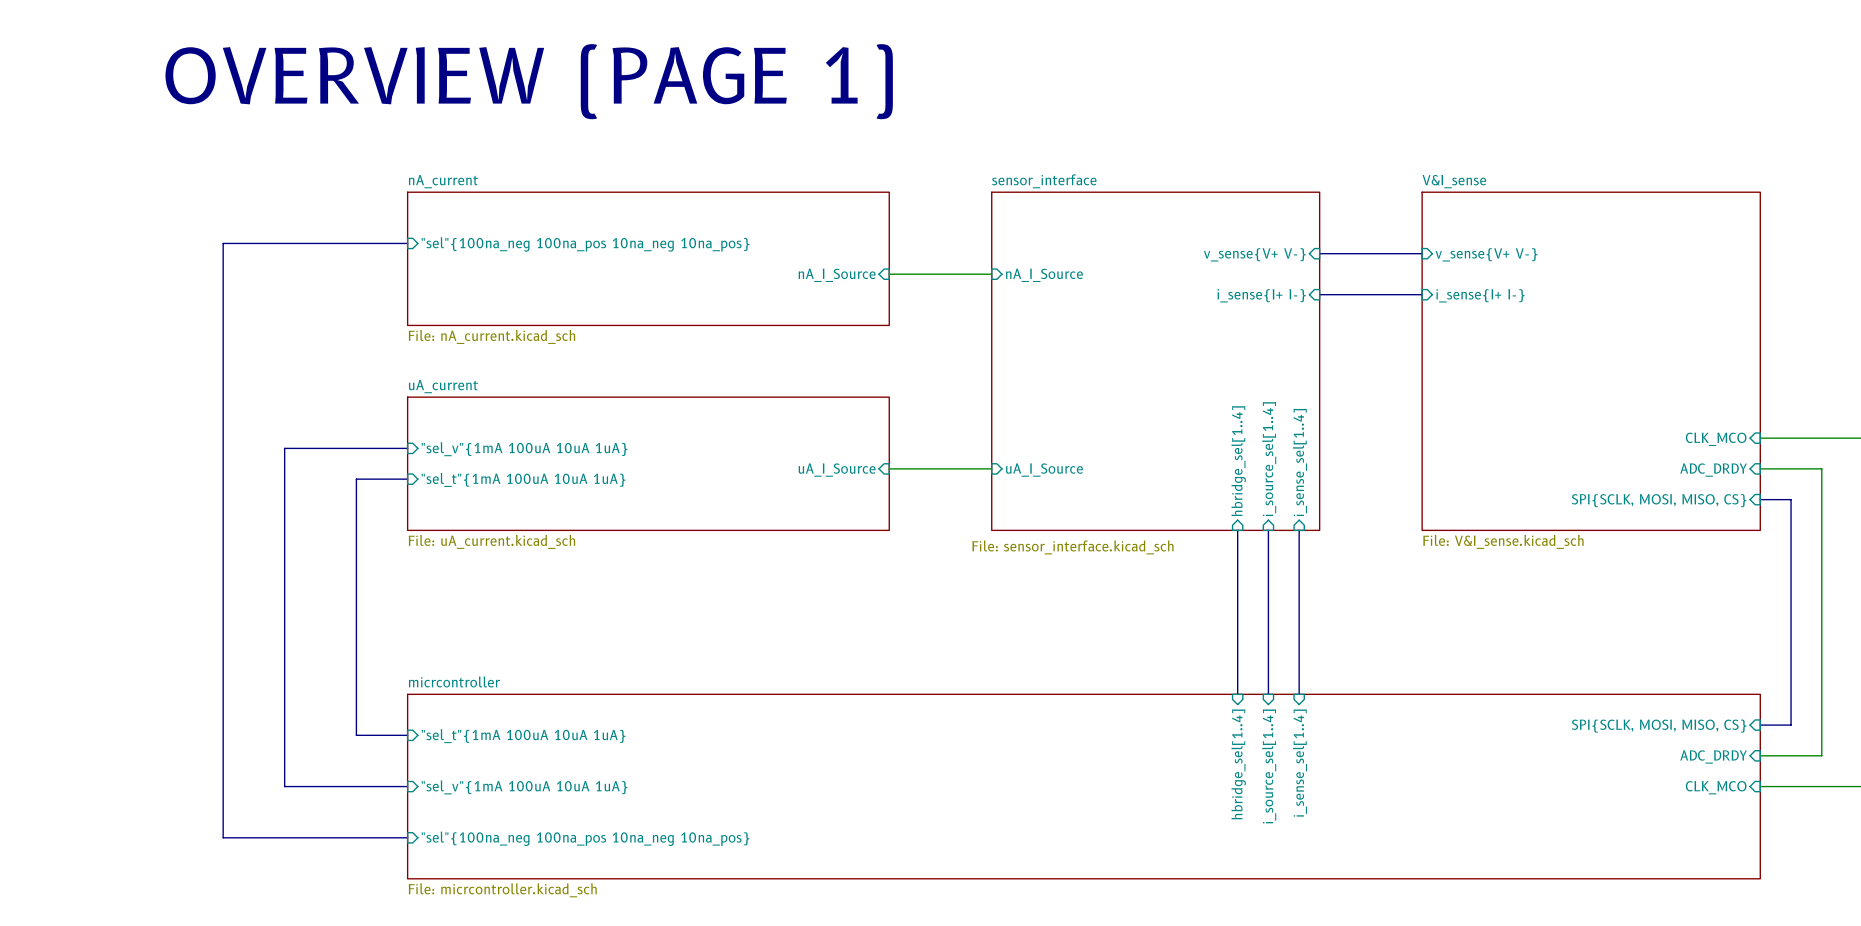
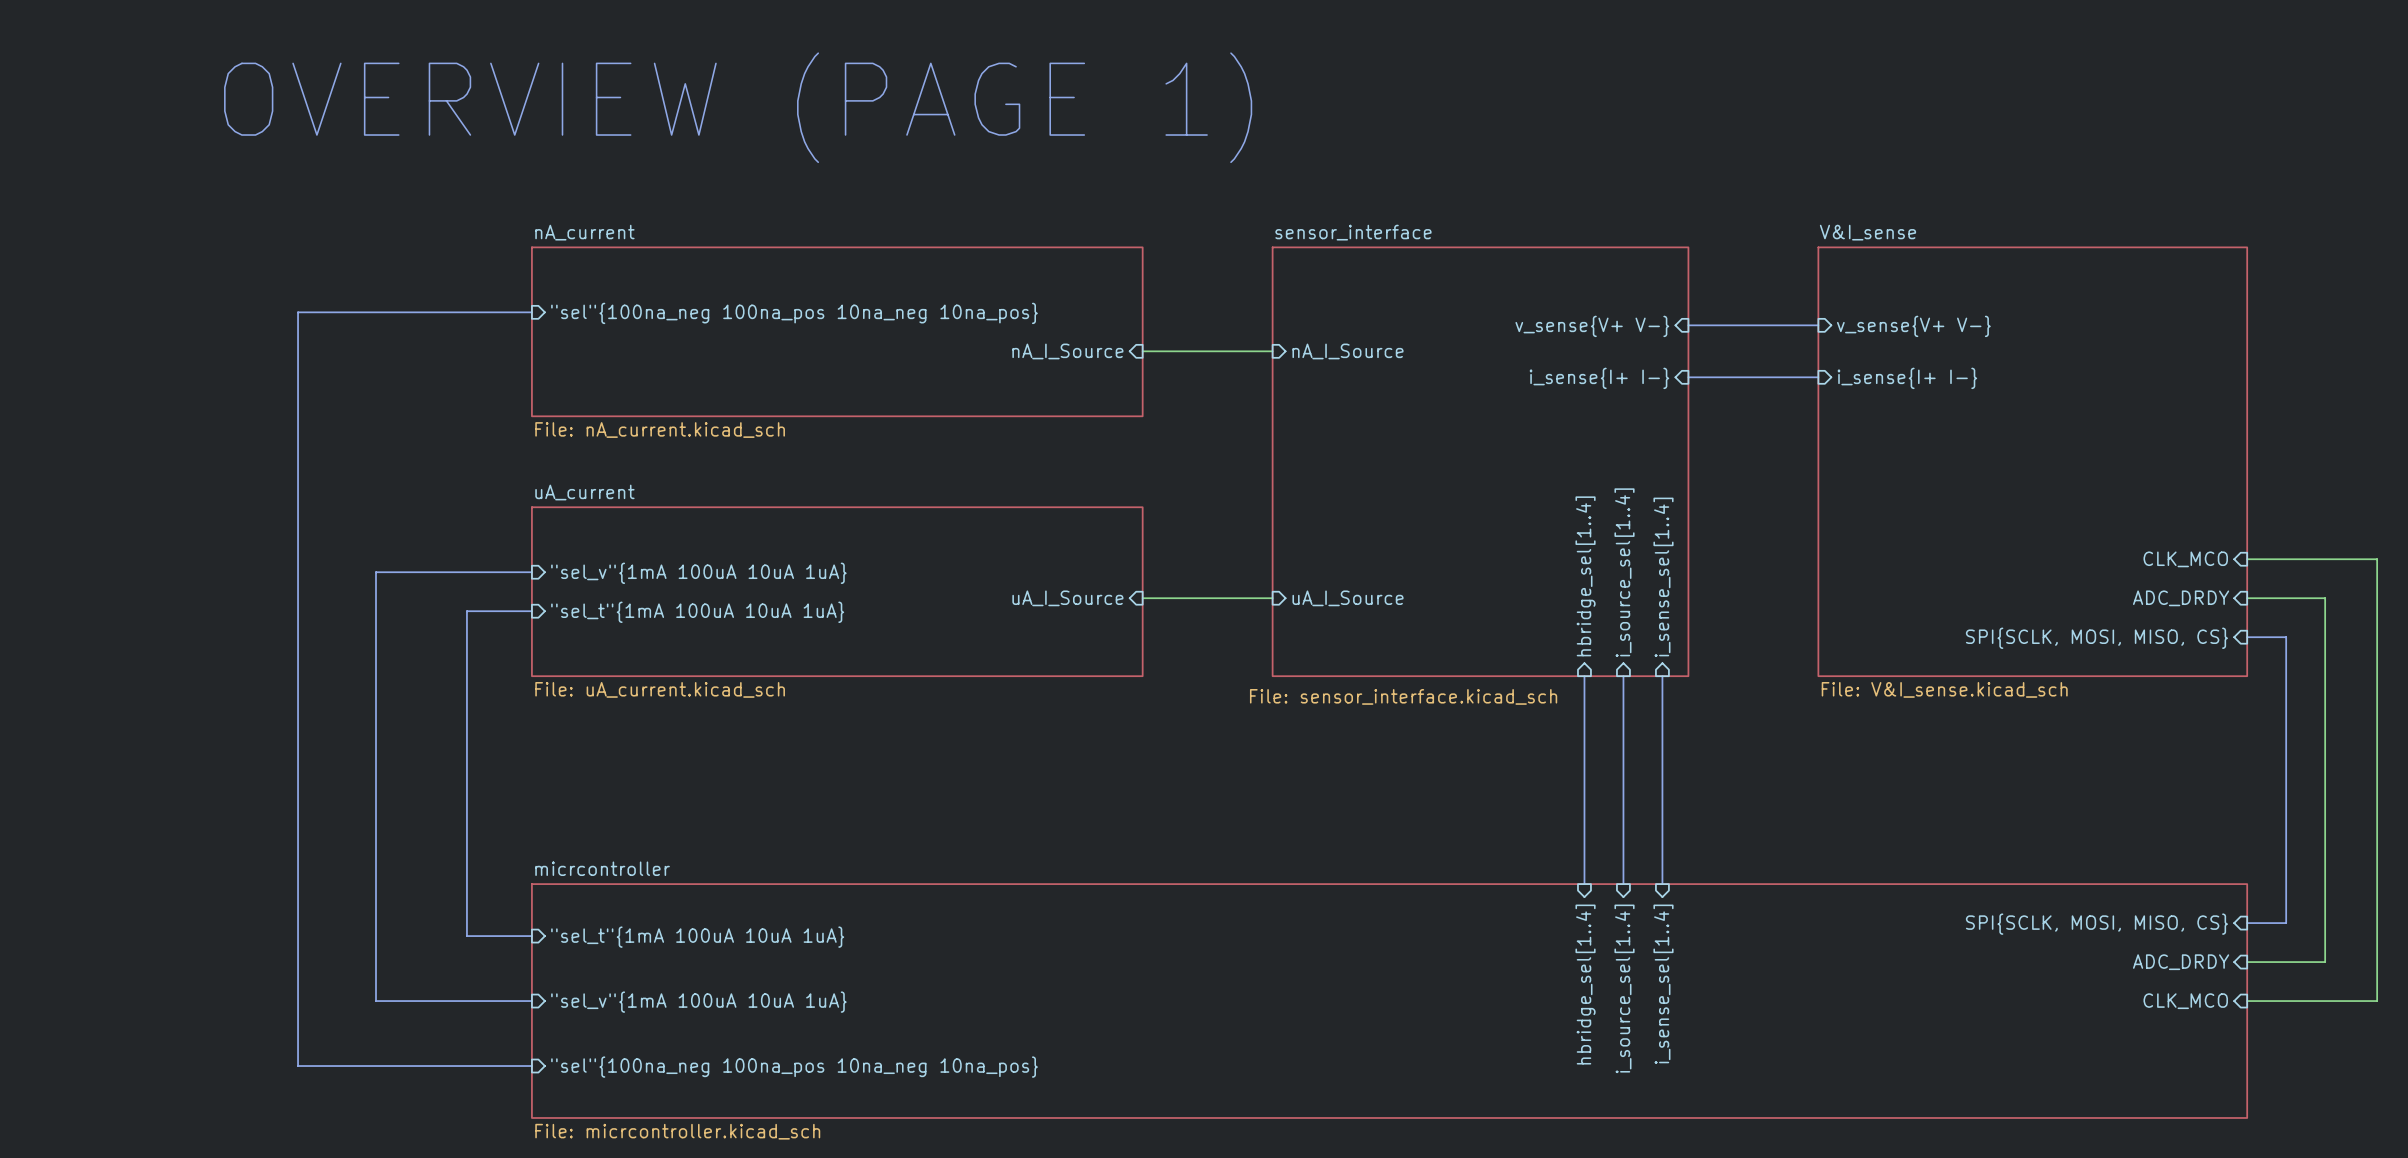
text position: OVERVIEW (PAGE 1) (529, 81) -> OVERVIEW (PAGE 1) (738, 107)

